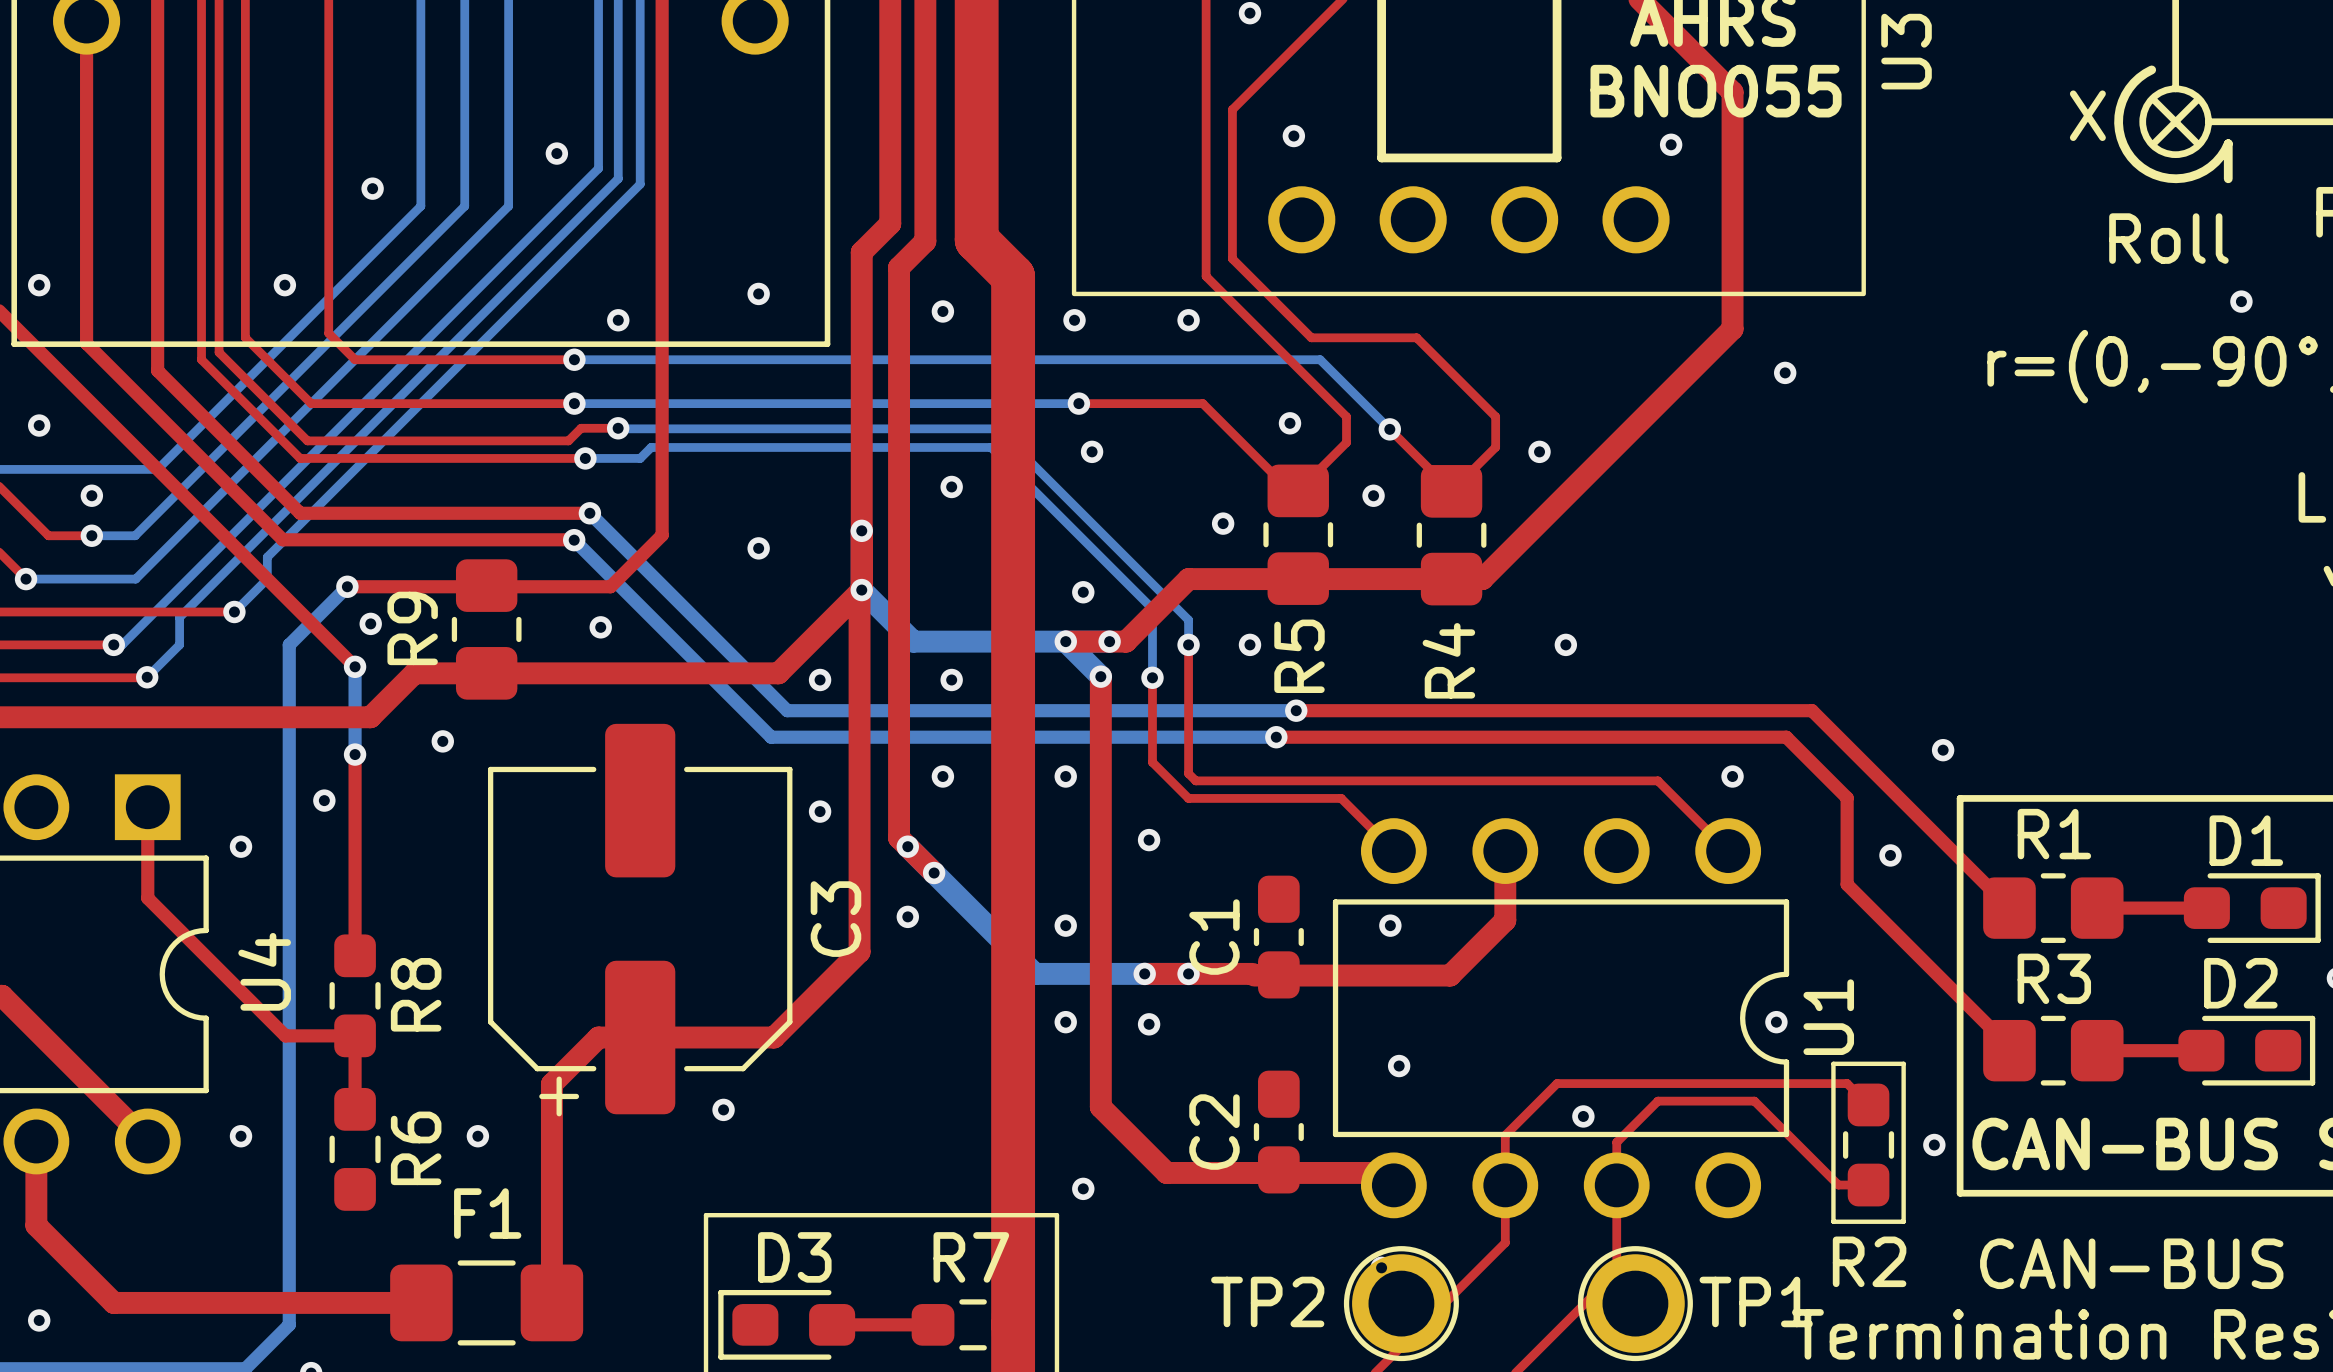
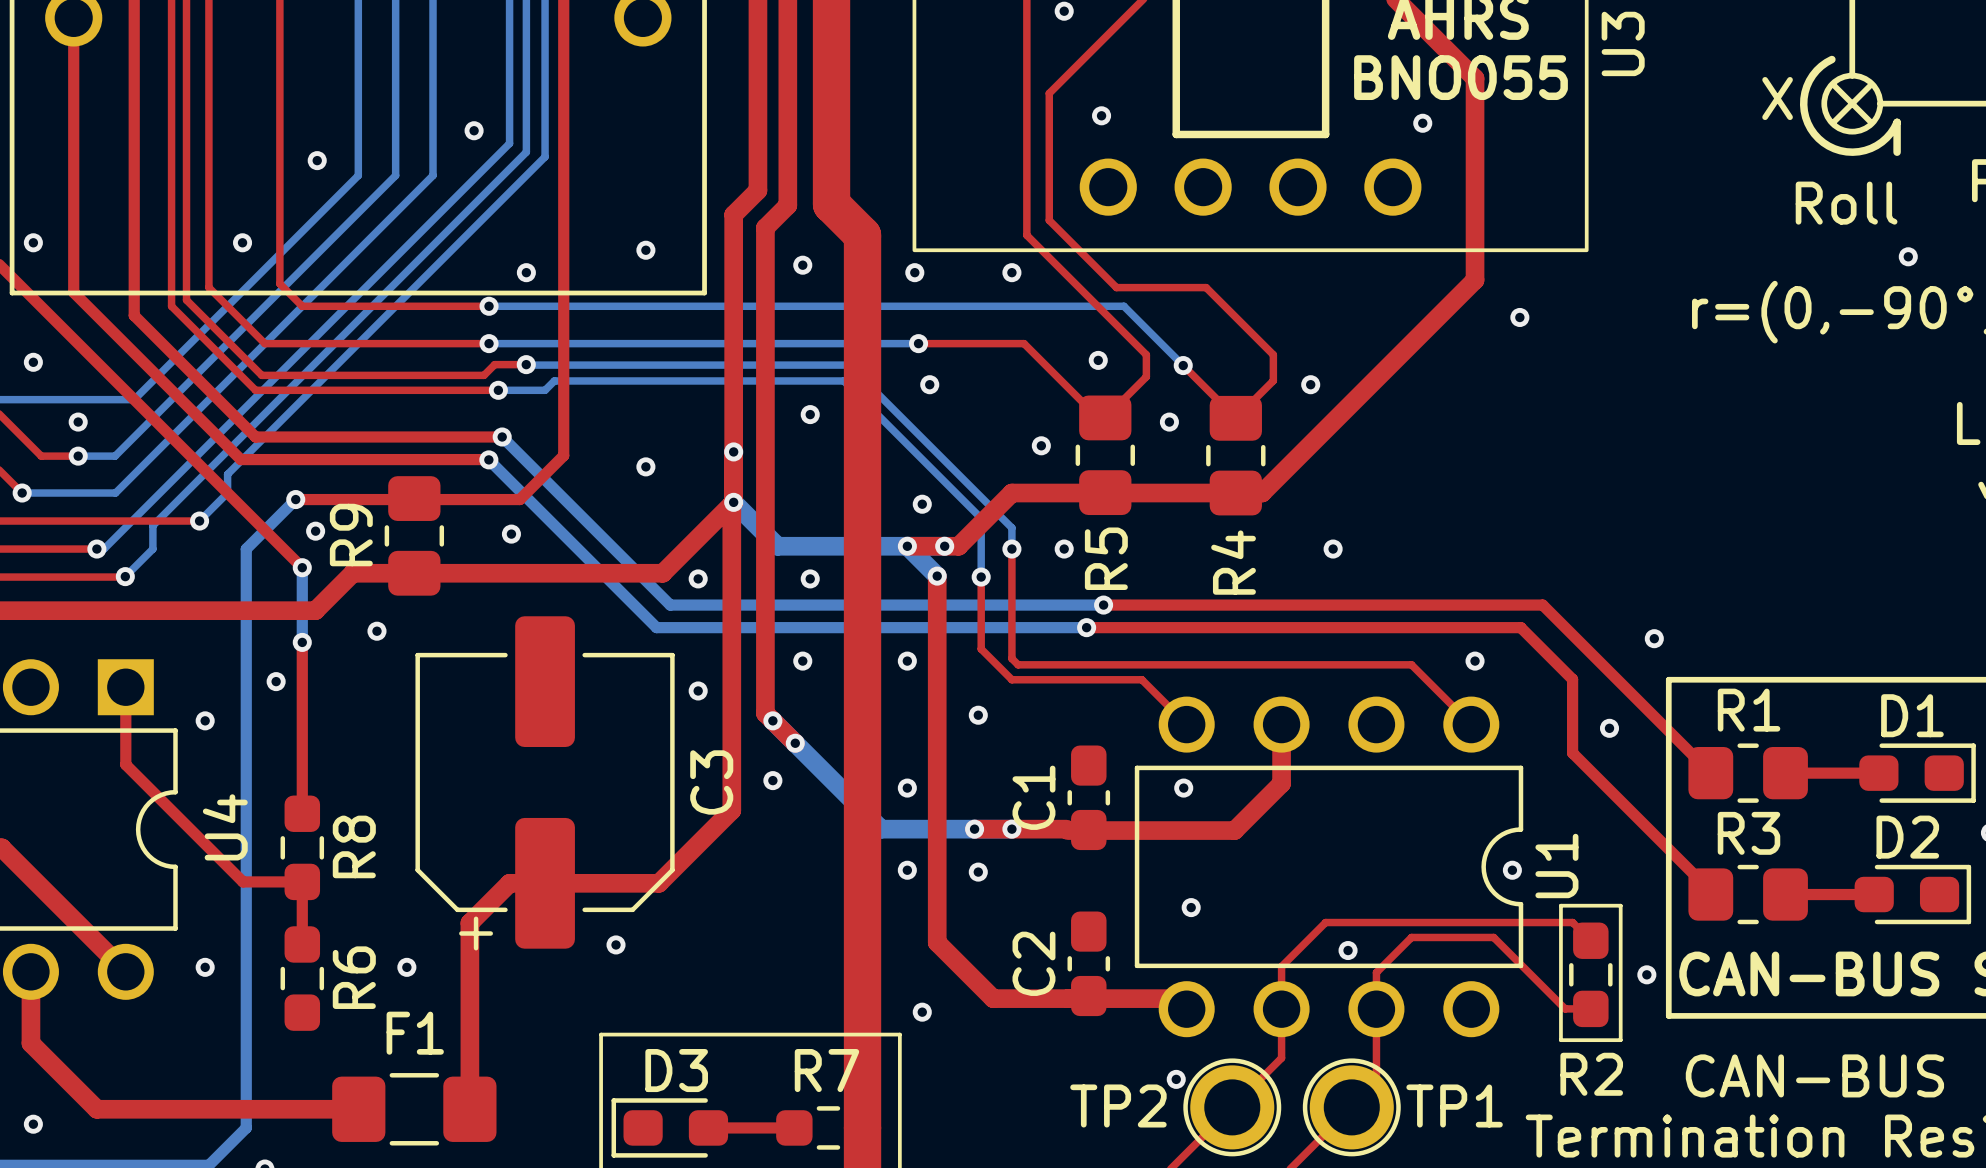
TP2 position: (1401, 1303) -> (1232, 1107)
TP1 position: (1635, 1303) -> (1351, 1107)

